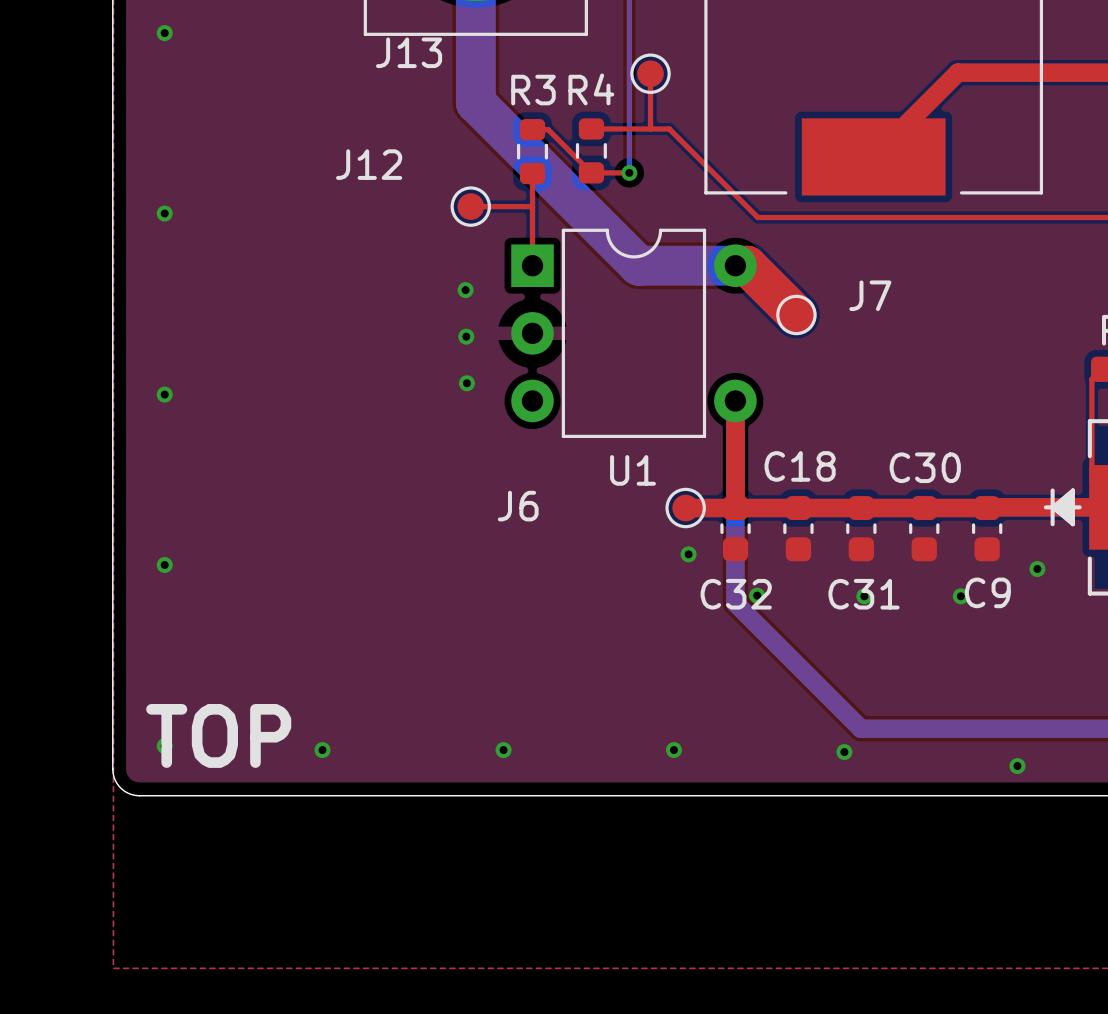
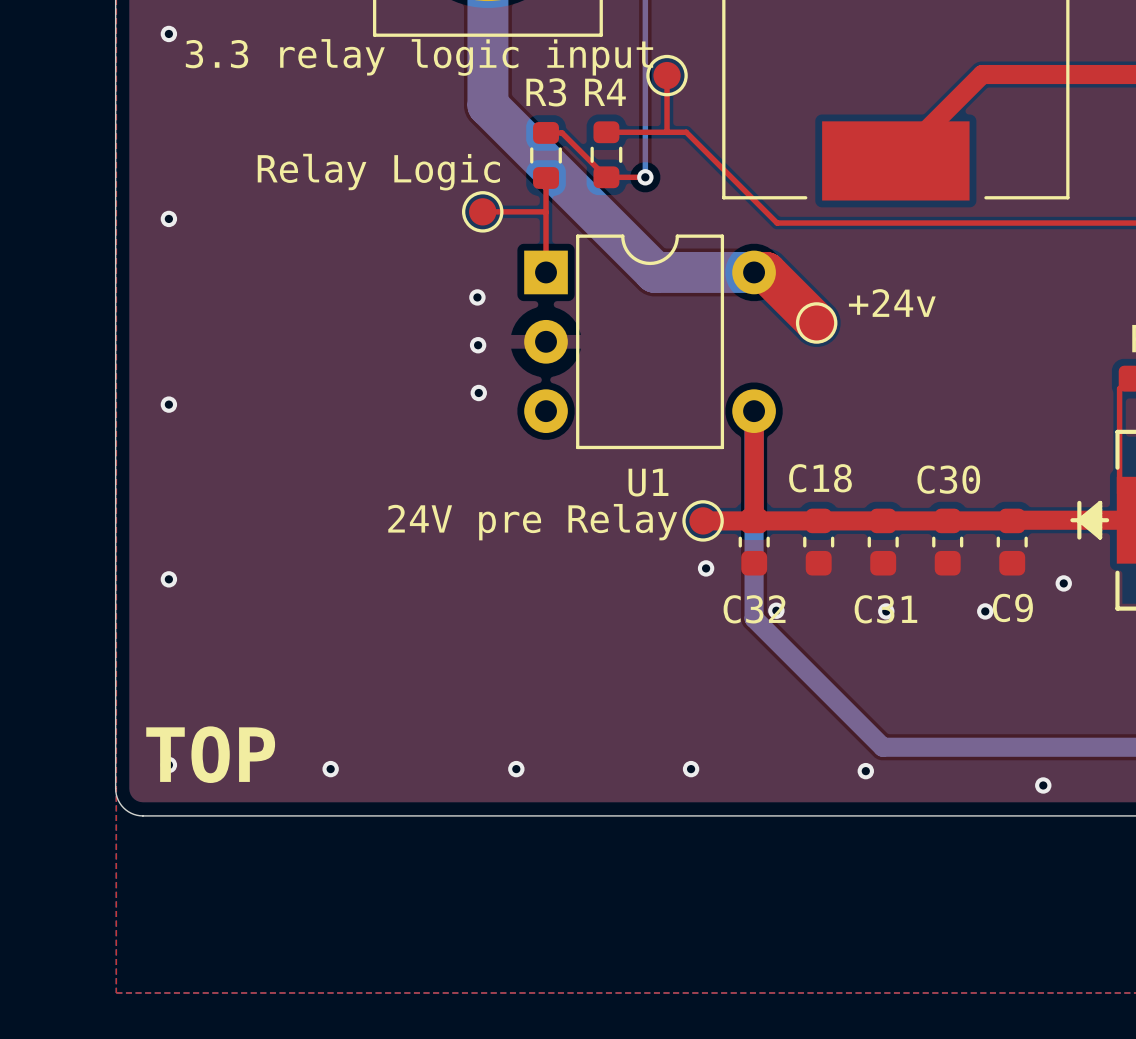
J13 name: J13 (409, 52) -> 3.3 relay logic input (419, 57)
J12 name: J12 (369, 164) -> Relay Logic (378, 172)
J7 name: J7 (870, 295) -> +24v (892, 303)
J6 name: J6 (518, 506) -> 24V pre Relay (532, 522)

